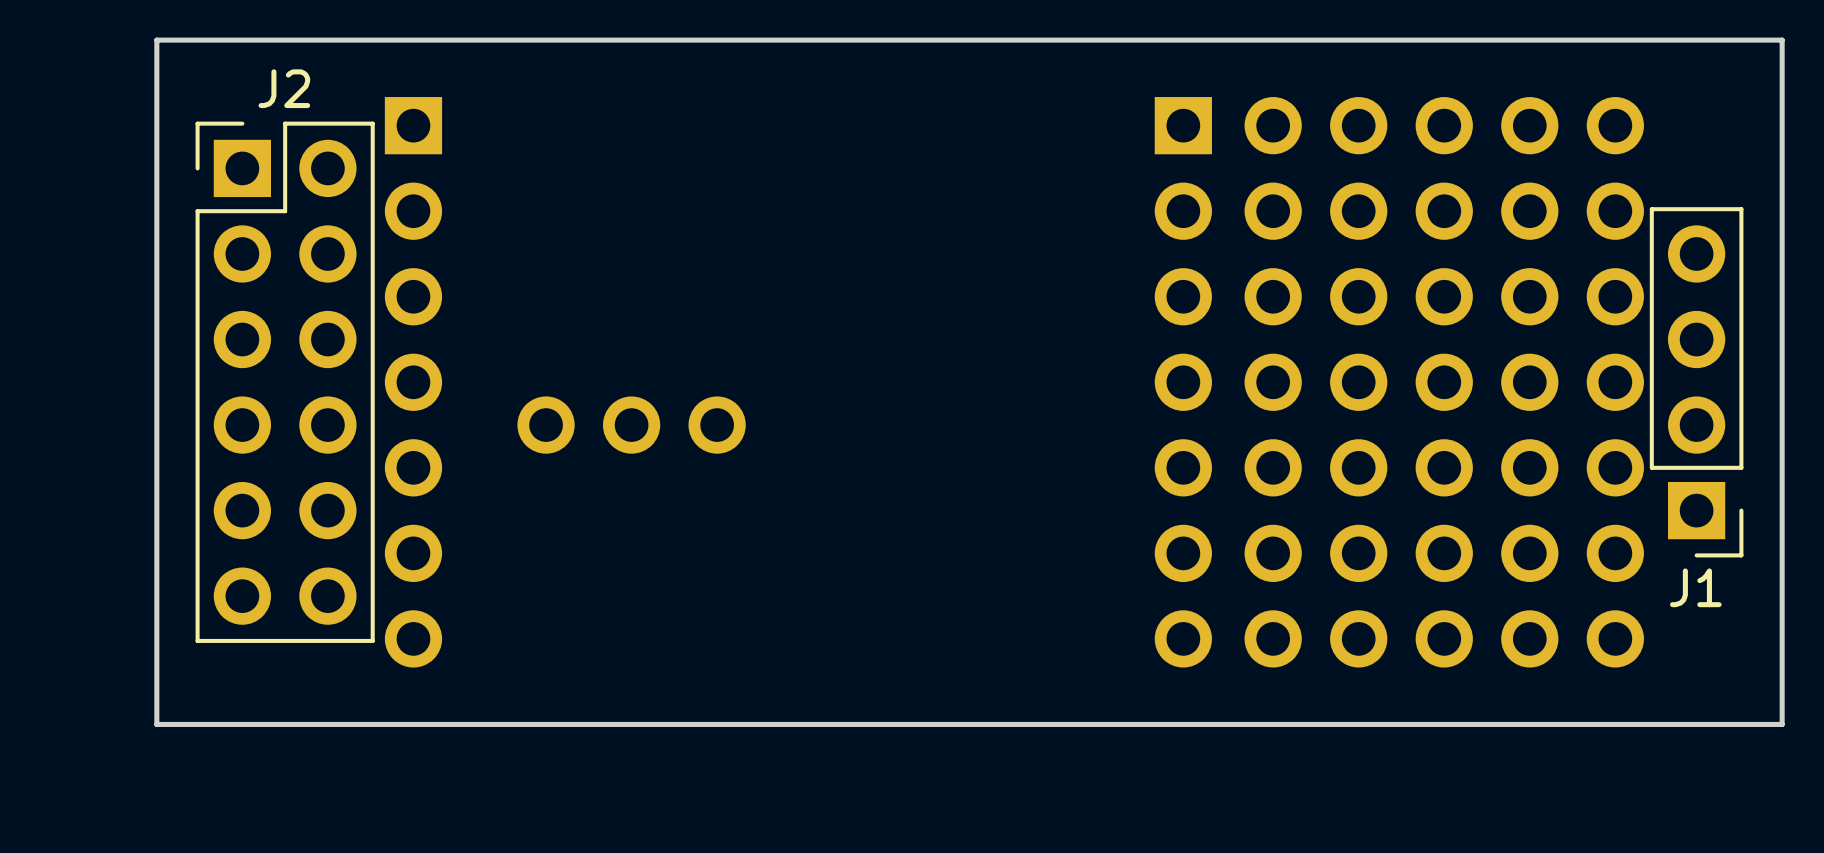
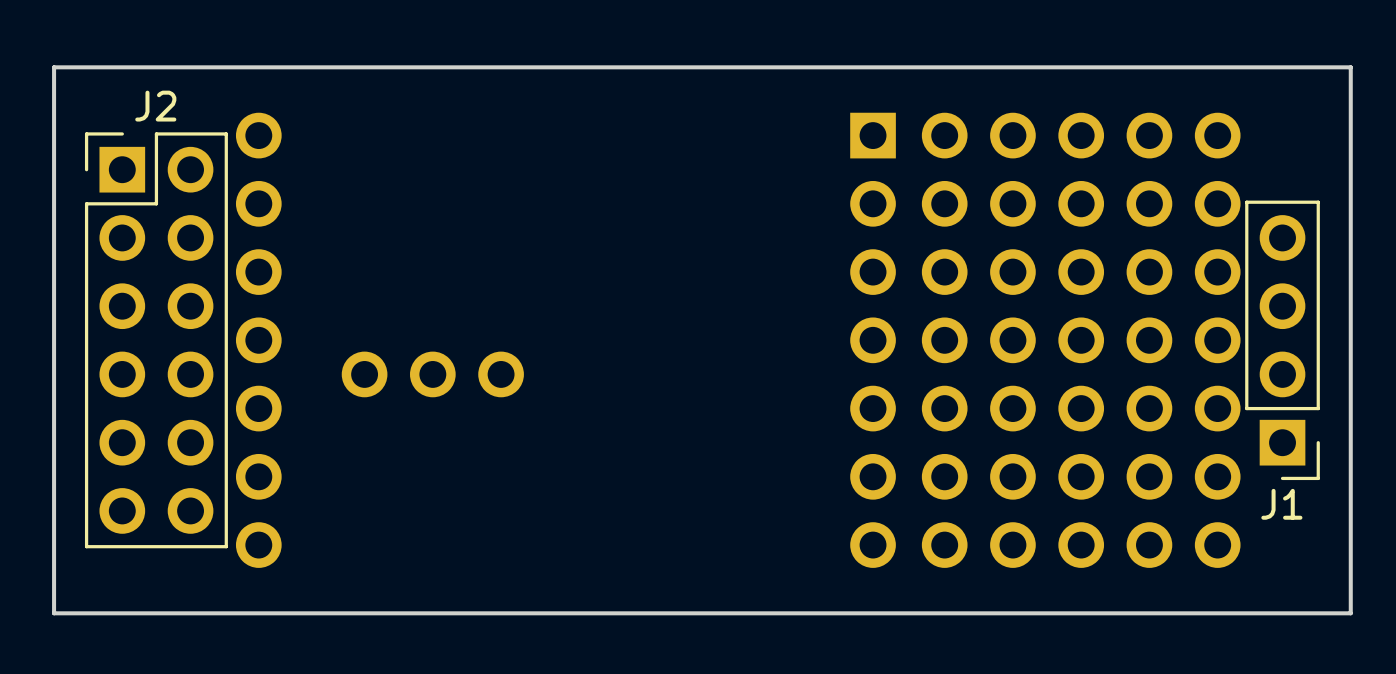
part footprint: [384, 97, 443, 668] -> [235, 112, 282, 568]

